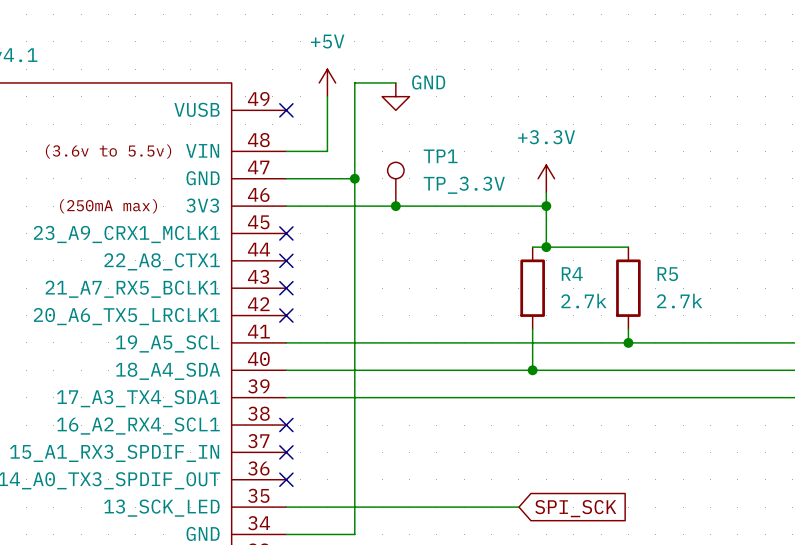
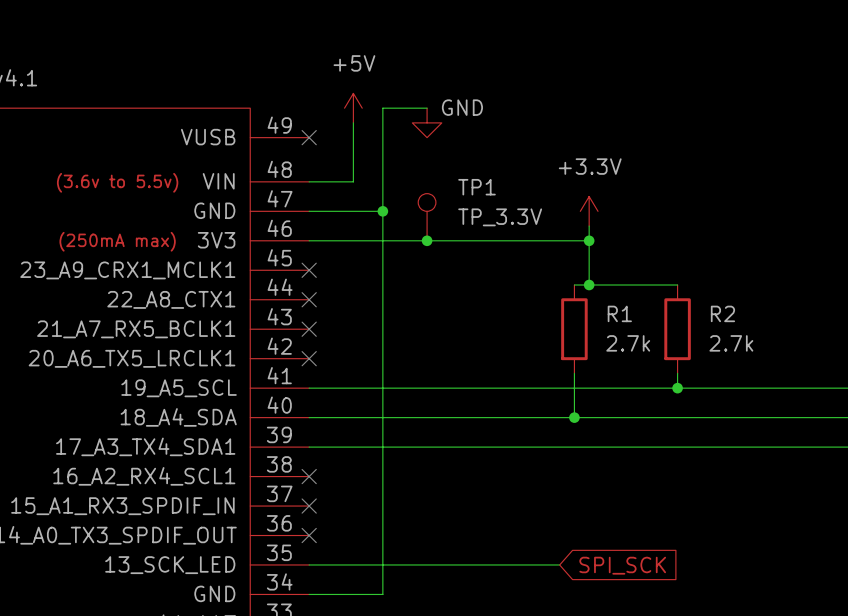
R4 name: R4 (572, 274) -> R1 (619, 313)
R5 name: R5 (667, 274) -> R2 (722, 313)

